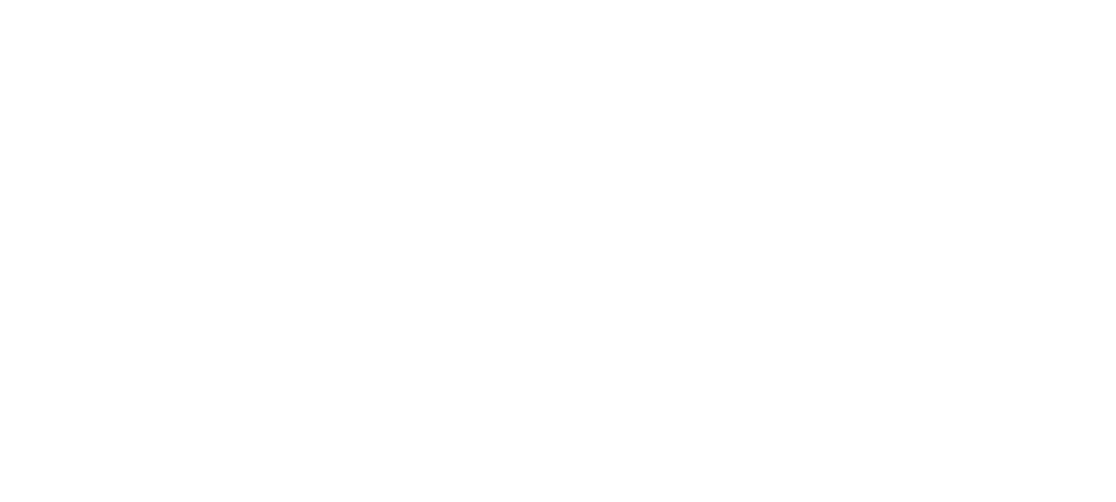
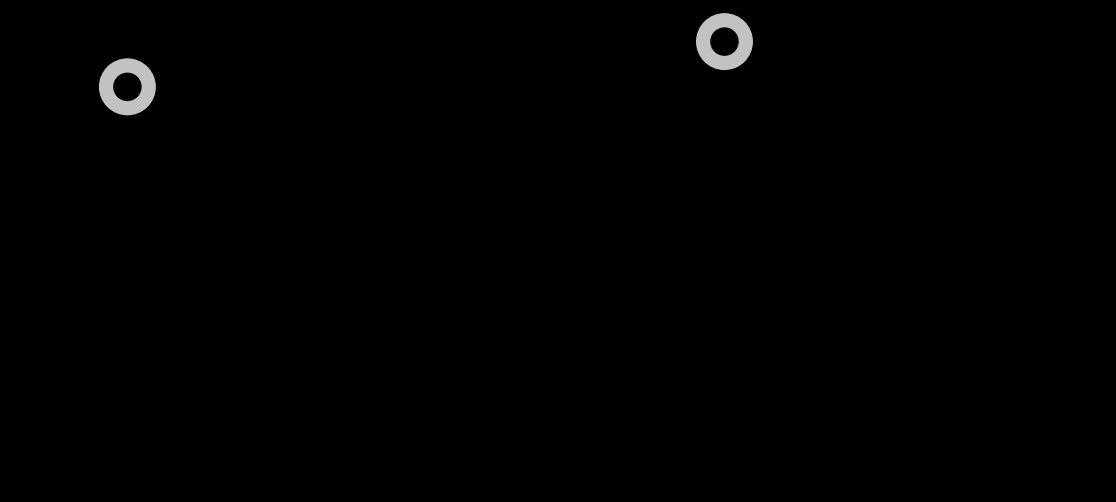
via: none -> (724, 41)
via: none -> (127, 86)

